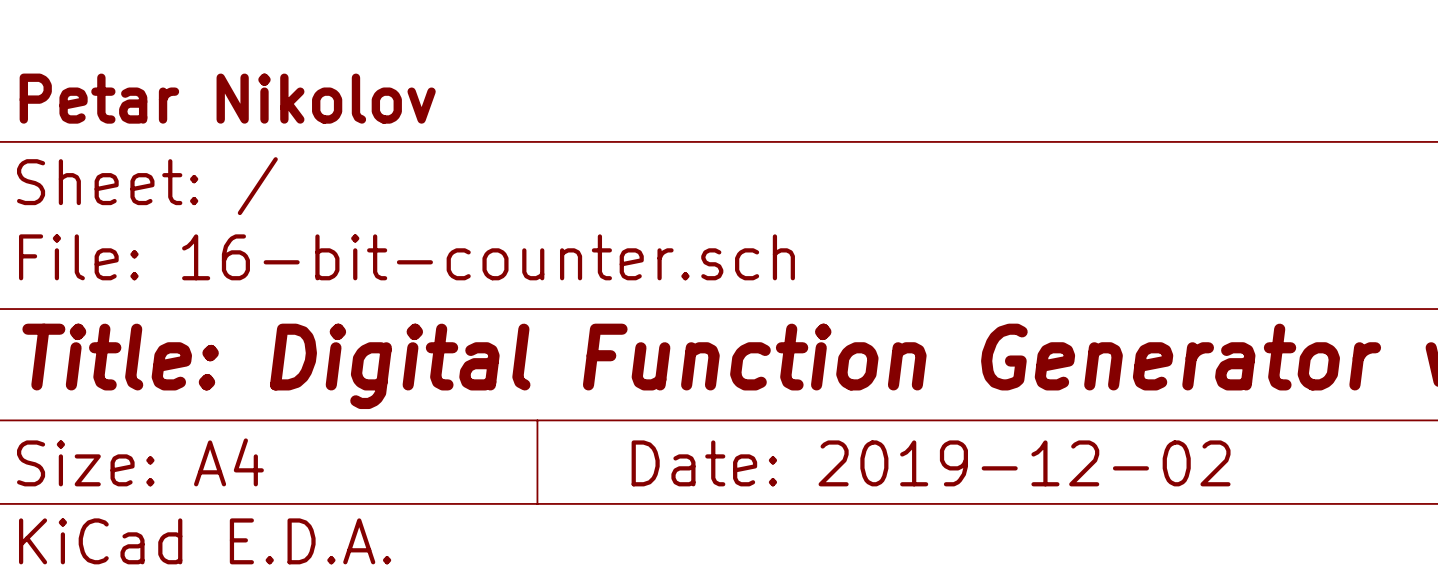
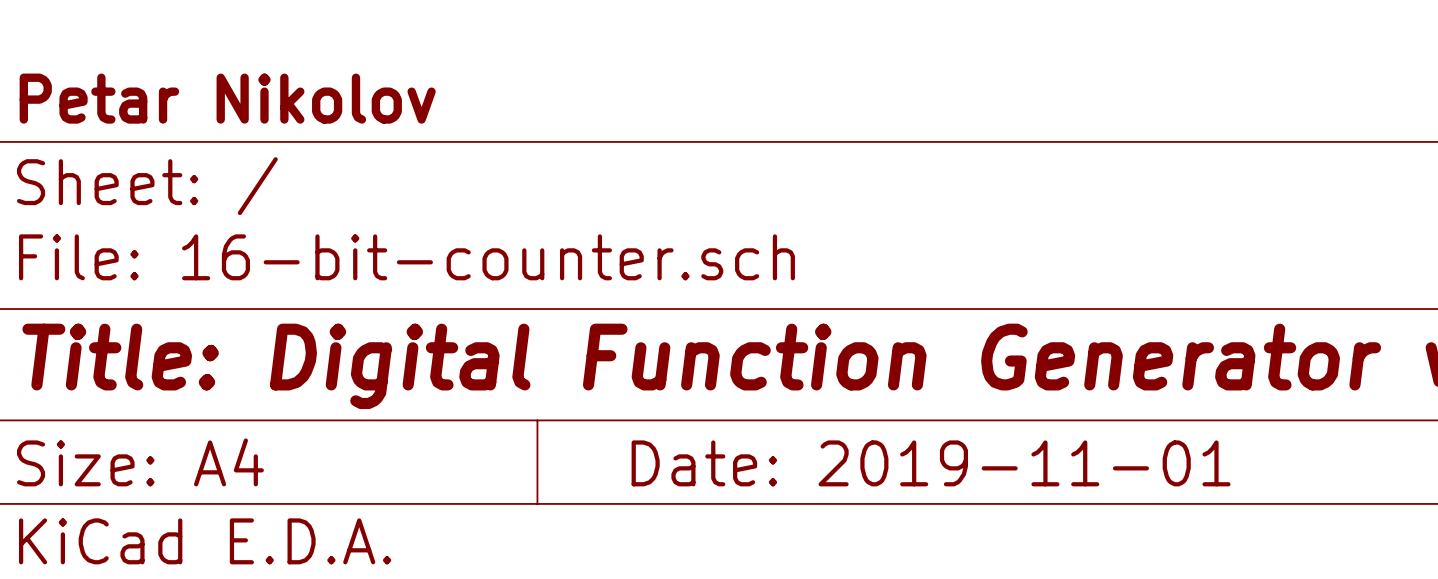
title block: Date: 2019-12-02 (931, 463) -> Date: 2019-11-01 (931, 463)

